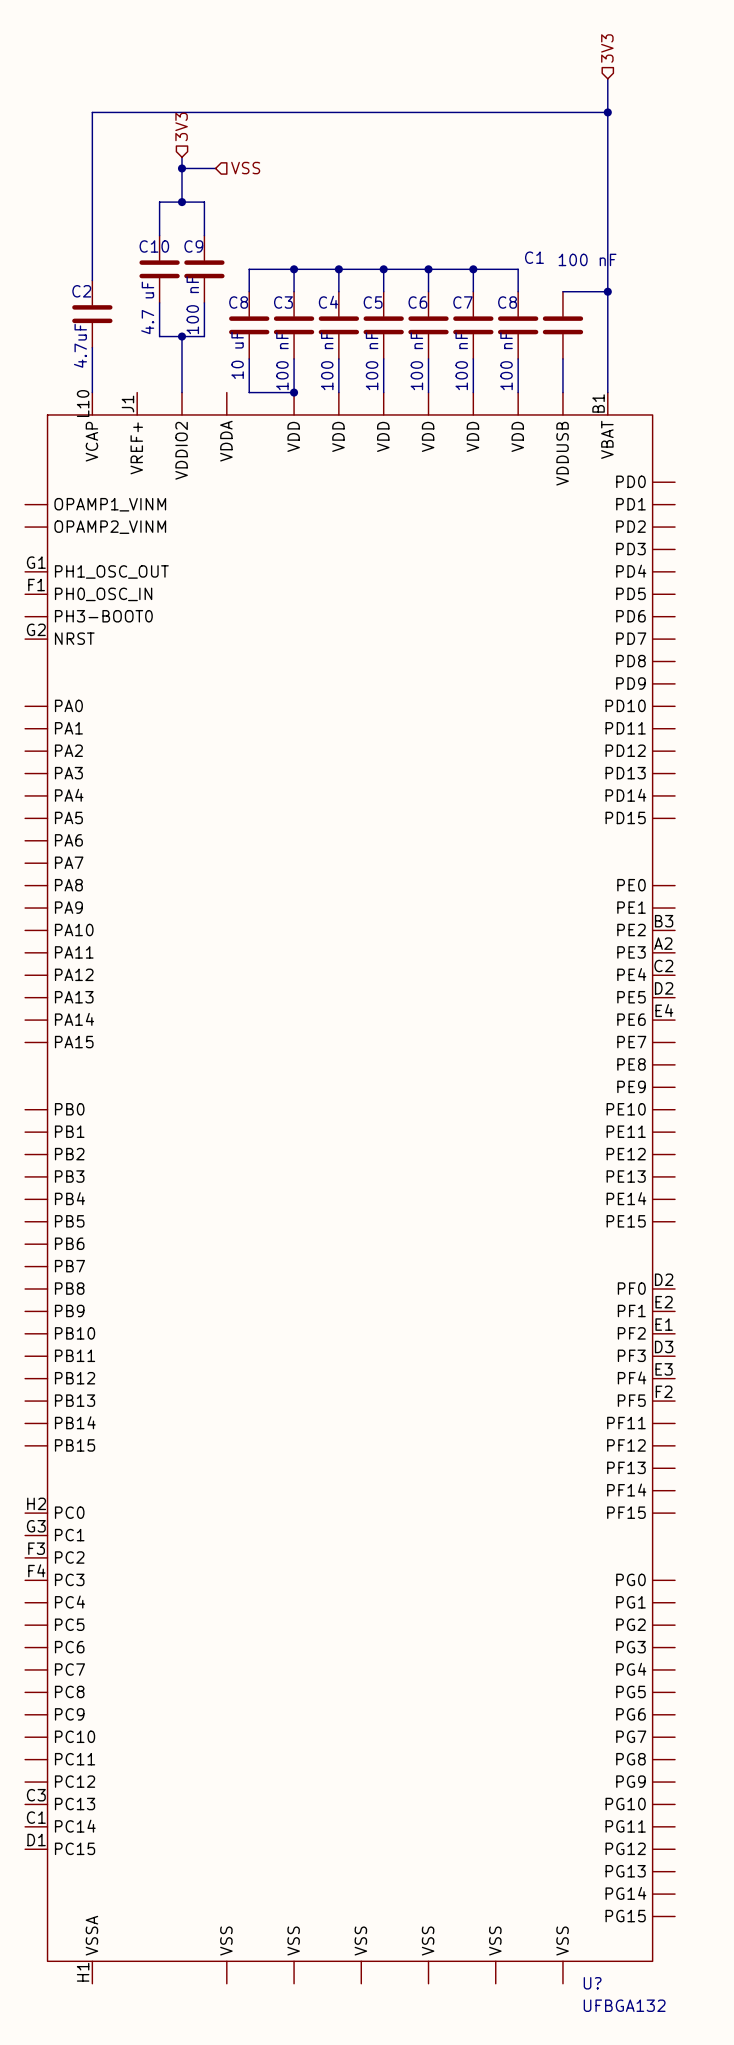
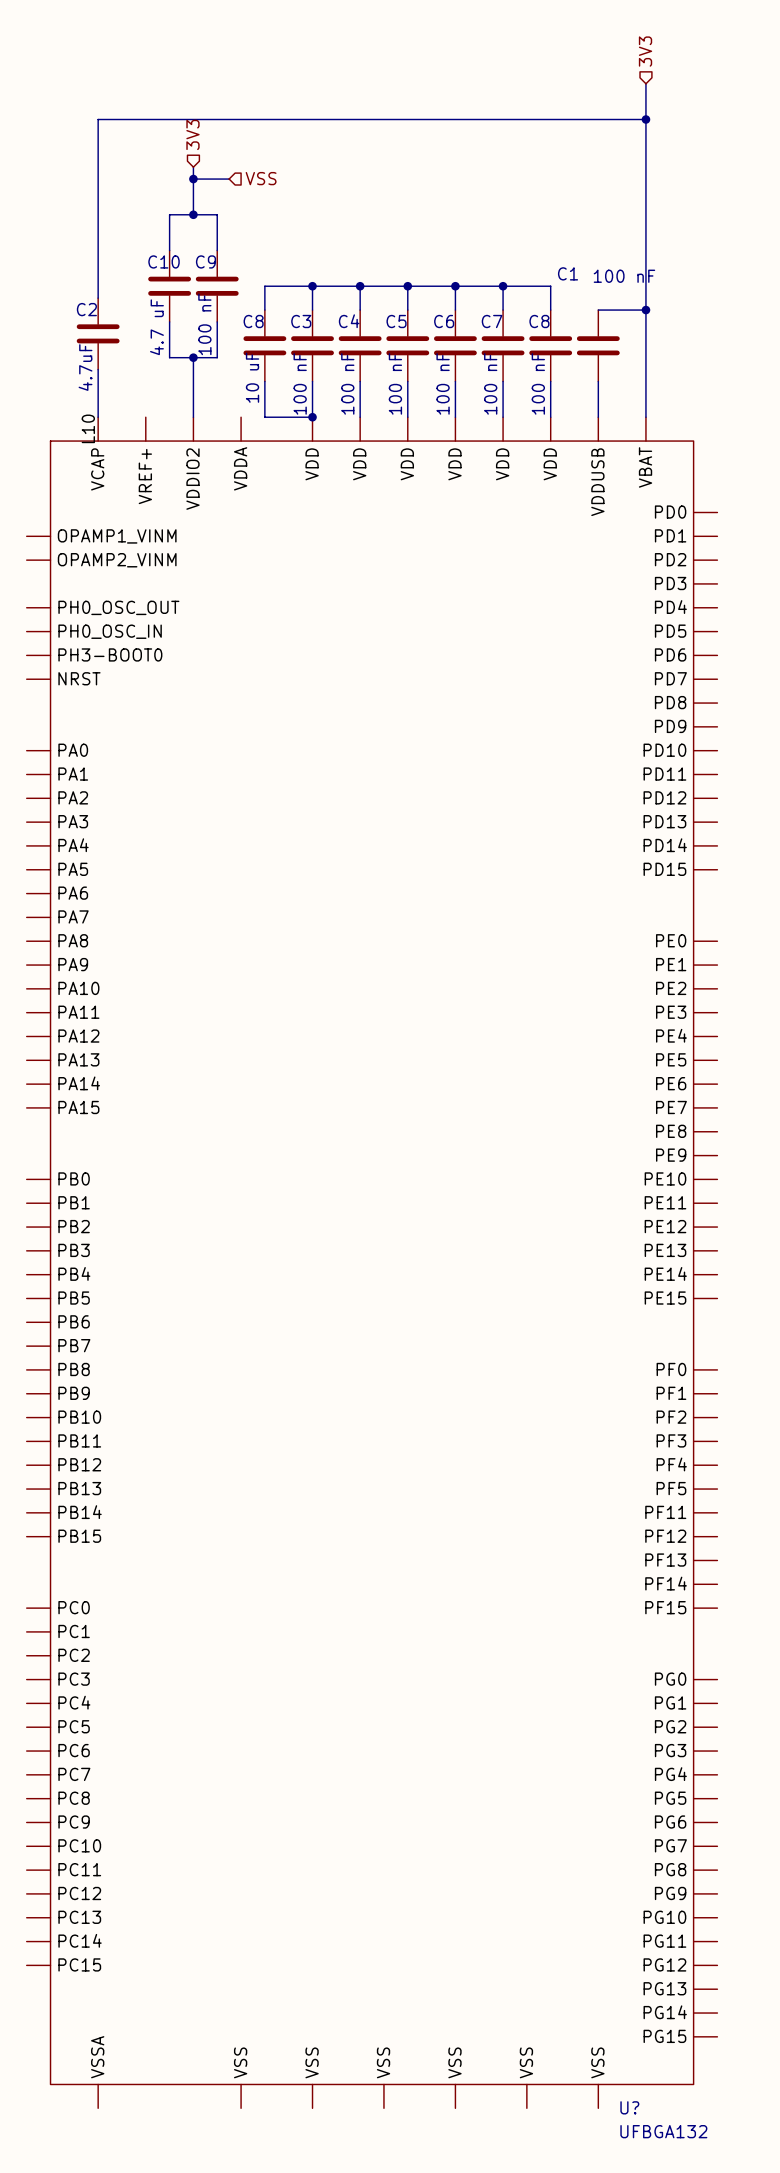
U? symbol: [25, 392, 676, 1984] -> [26, 417, 718, 2109]

